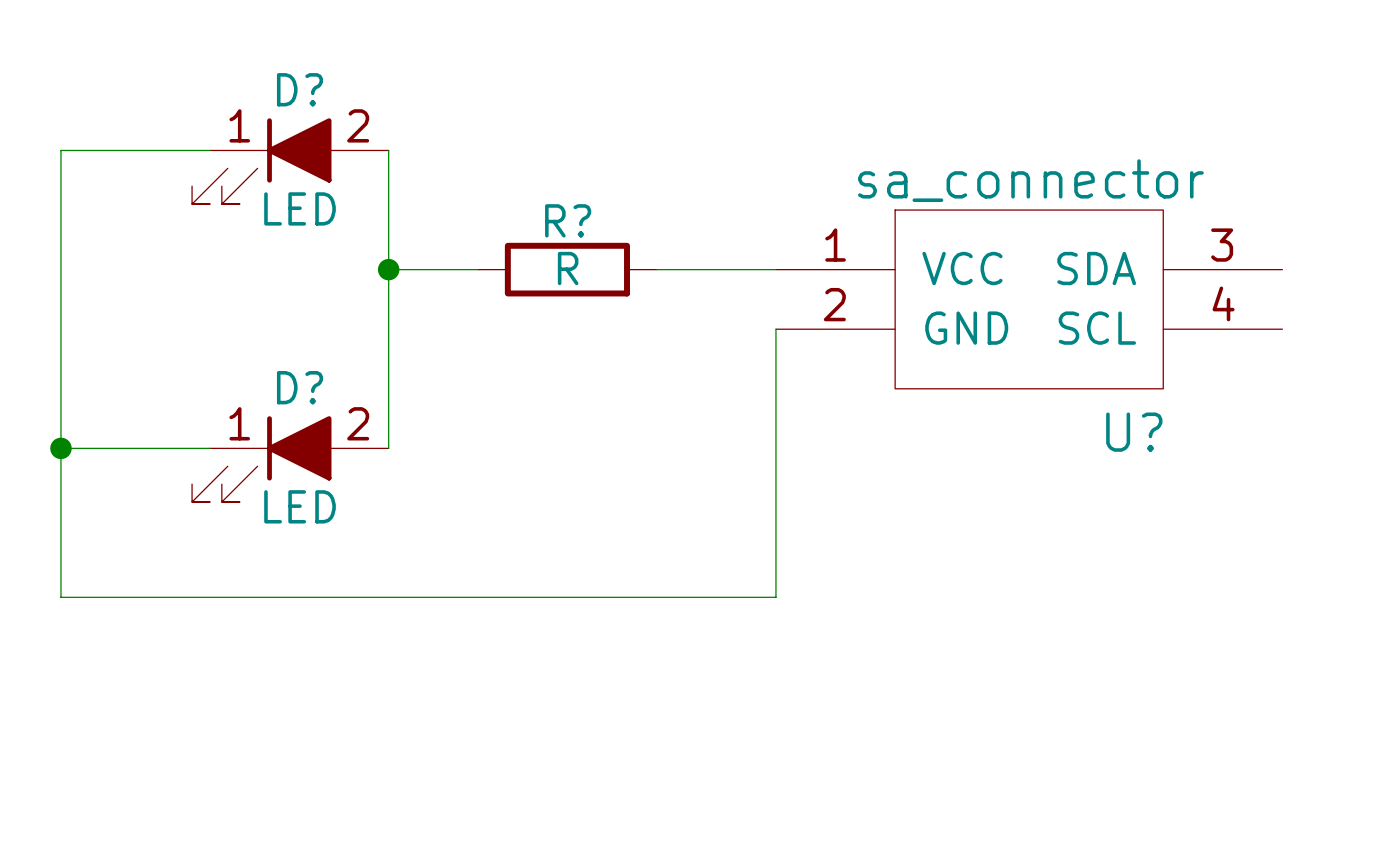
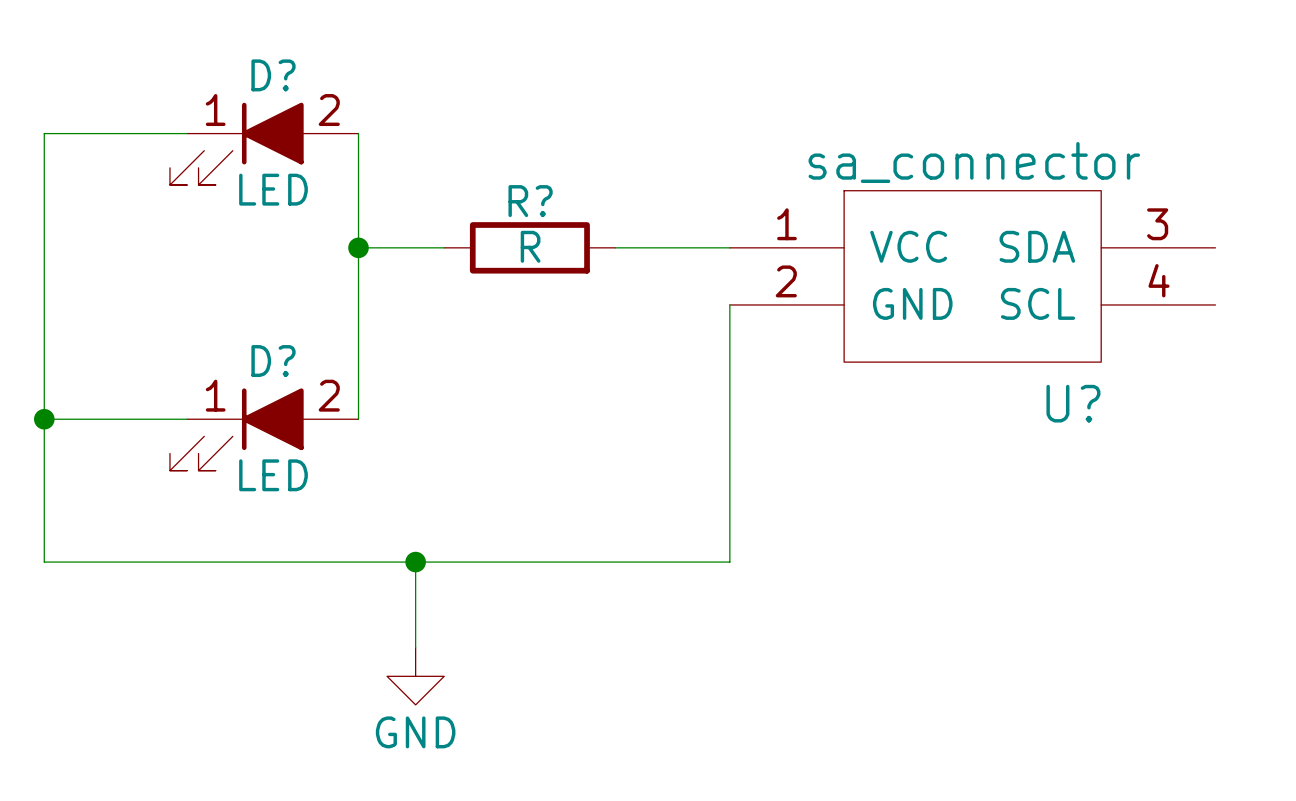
wire: none -> (415, 562) (415, 647)
junction: none -> (415, 562)
power symbol: none -> GND (415, 676)

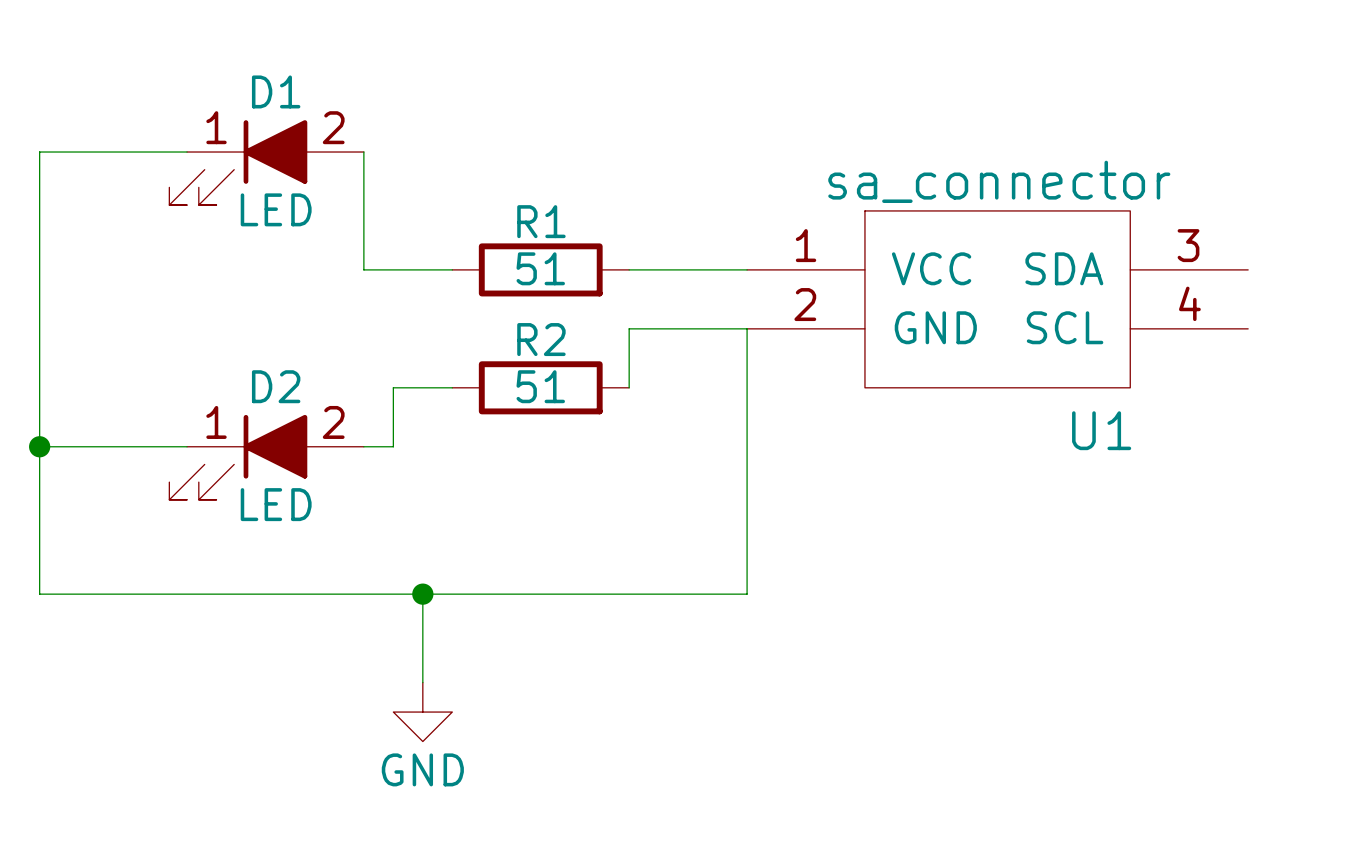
D? name: D? (273, 75) -> D1 (276, 91)
R? name: R? (530, 201) -> R1 (541, 221)
R? value: R (530, 246) -> 51 (540, 268)
wire: (358, 247) (358, 419) -> (452, 387) (393, 387) (393, 446) (363, 446)
junction: (358, 247) -> none
wire: none -> (747, 328) (629, 328) (629, 387)
D? name: D? (273, 361) -> D2 (276, 386)
R2: none -> 51 (540, 387)
U? name: U? (1073, 403) -> U1 (1101, 430)

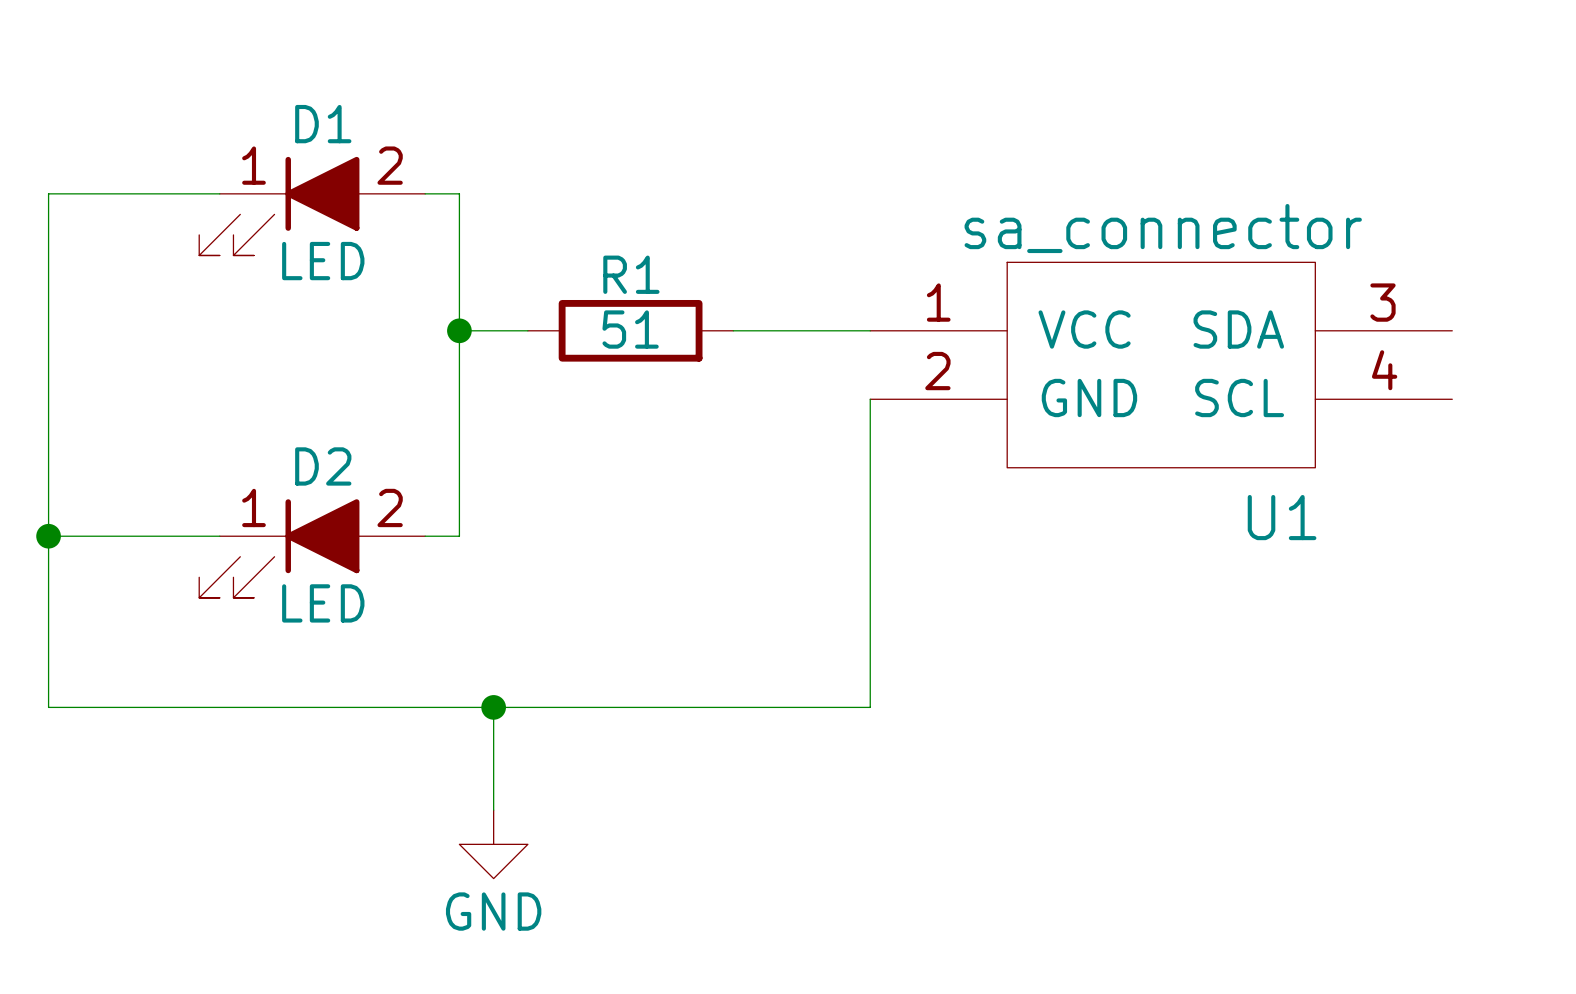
wire: (363, 152) (363, 269) (393, 269) -> (425, 193) (459, 193) (459, 467)
junction: none -> (459, 330)
wire: (747, 328) (629, 328) (629, 387) -> none
wire: (393, 387) (452, 387) -> none
R2: 51 (540, 387) -> none

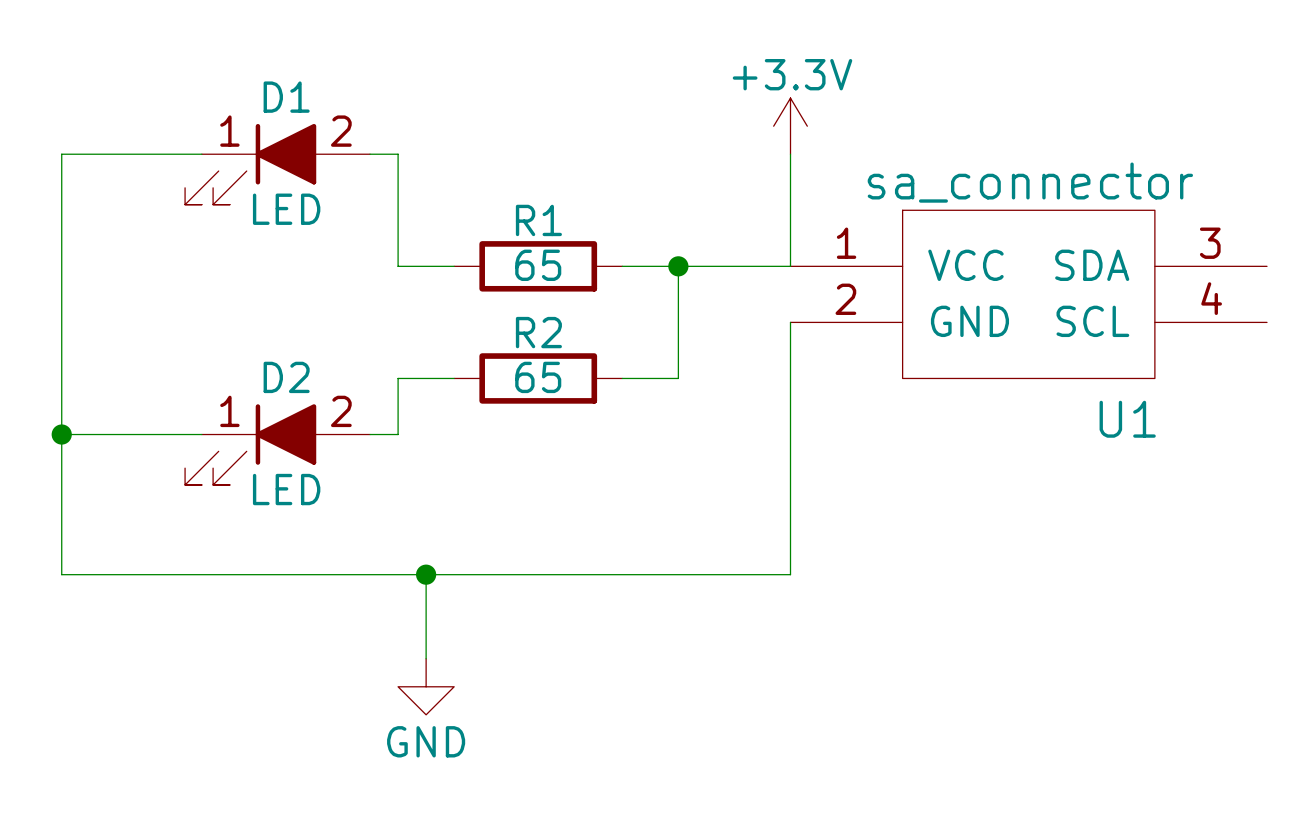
power symbol: none -> +3.3V (790, 126)
wire: none -> (790, 154) (790, 266) (734, 266)
R1 value: 51 (630, 329) -> 65 (538, 265)
wire: (459, 330) (459, 467) -> (454, 378) (398, 378)
junction: (459, 330) -> none
wire: none -> (678, 266) (678, 378) (622, 378)
junction: none -> (678, 266)
U1 position: (1161, 365) -> (1028, 294)
wire: (870, 399) (870, 707) -> (790, 322) (790, 574) (734, 574)
R2: none -> 65 (538, 378)

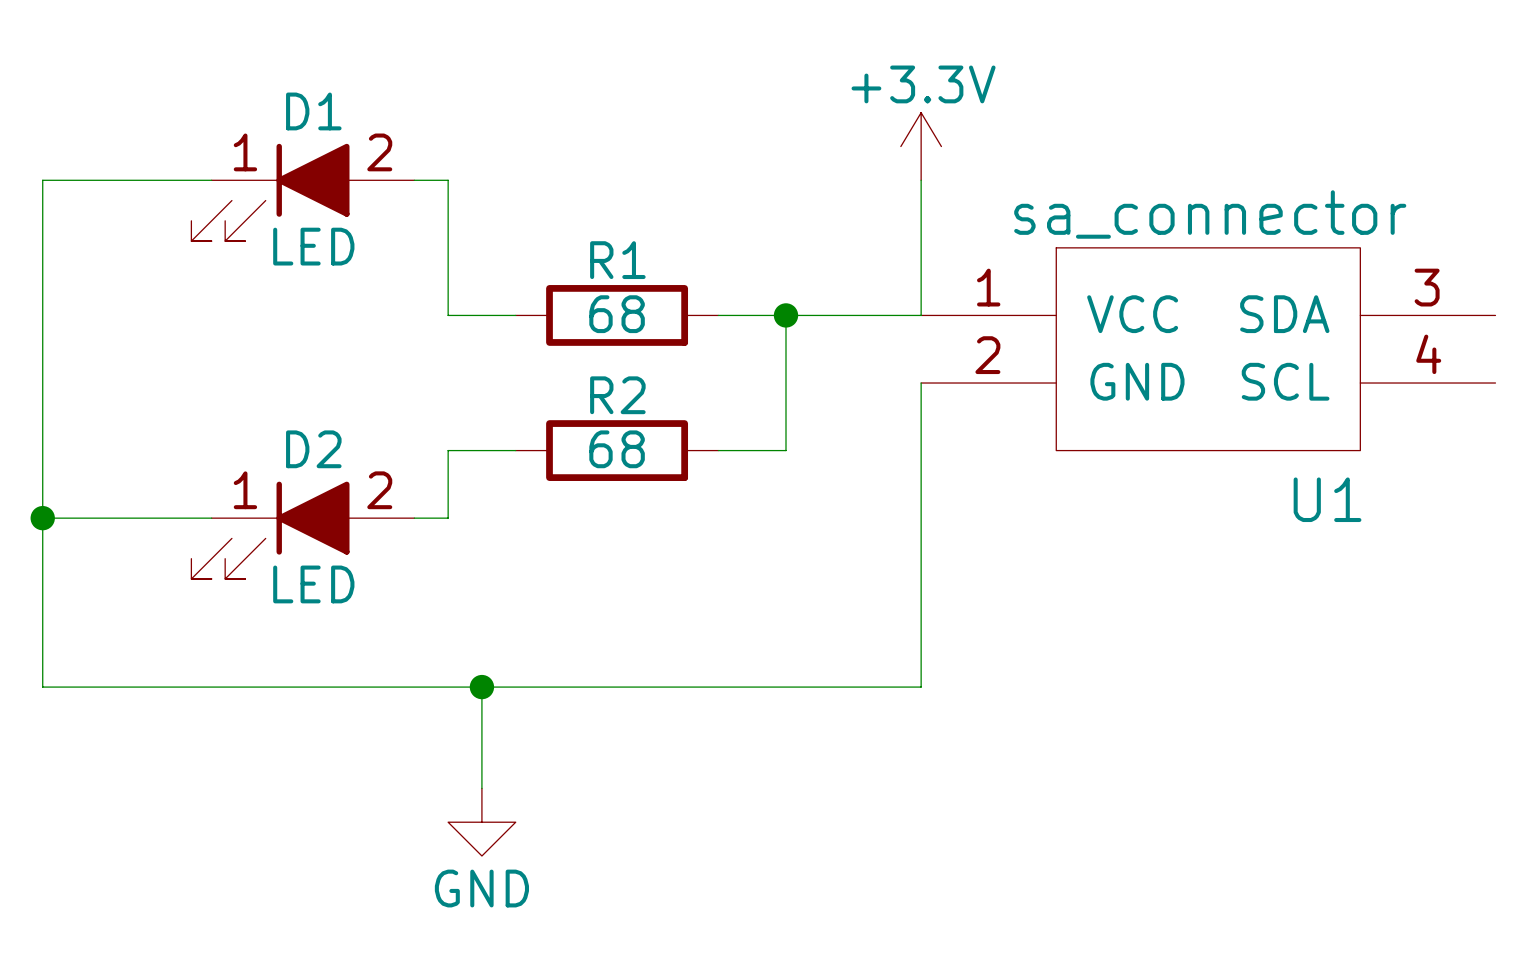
R1 value: 65 (538, 265) -> 68 (617, 314)
R2 value: 65 (538, 377) -> 68 (617, 449)

